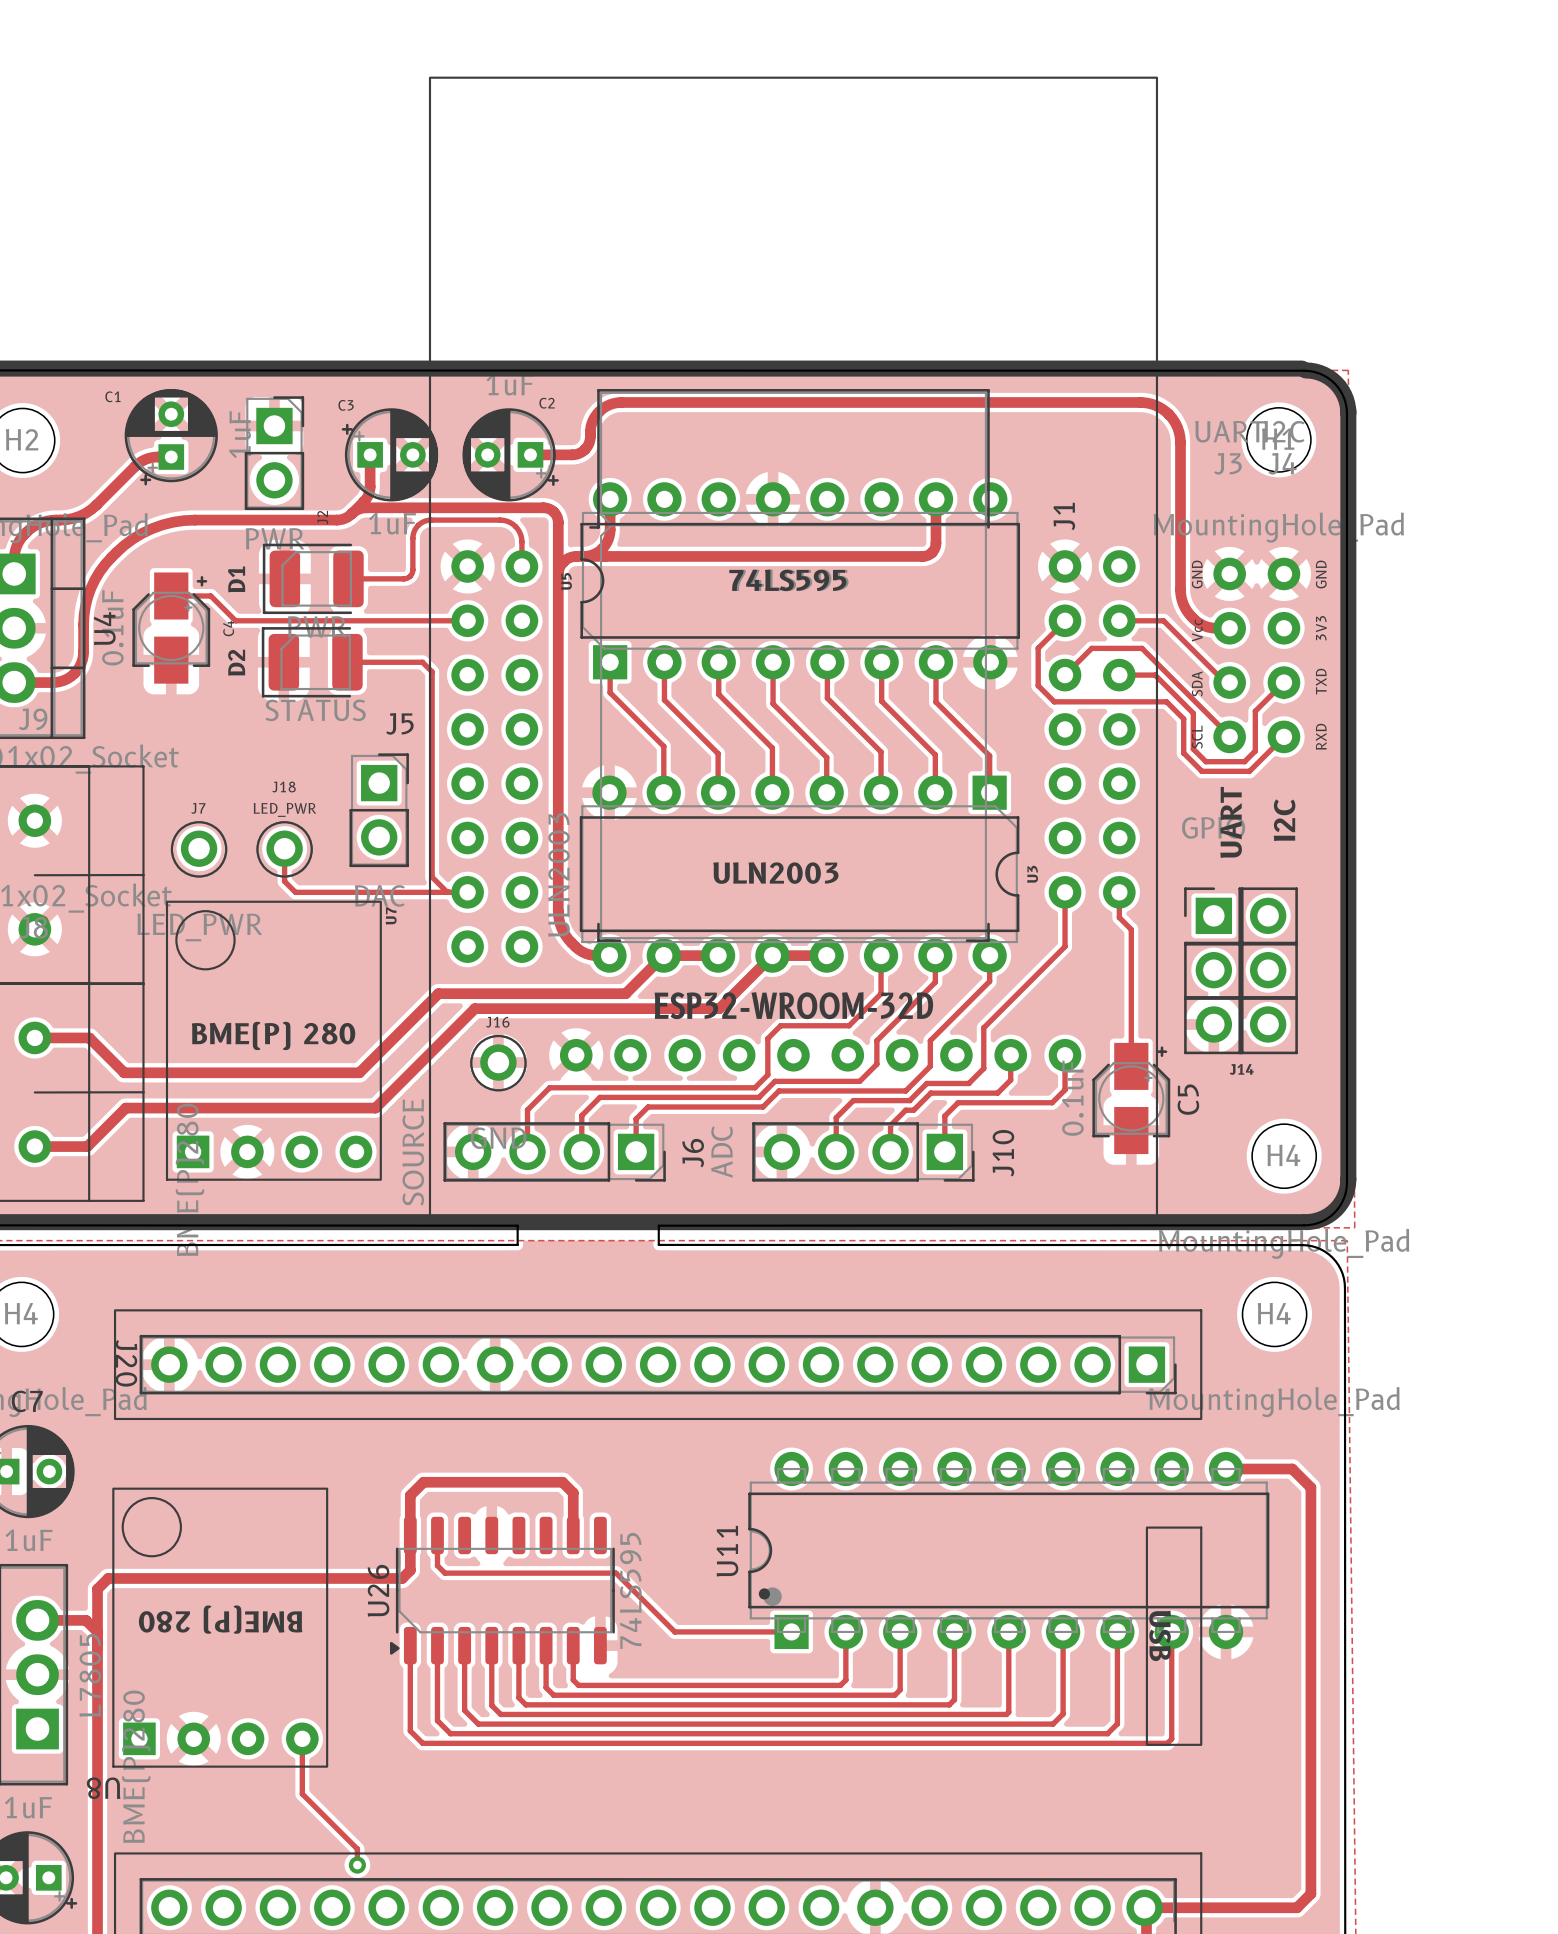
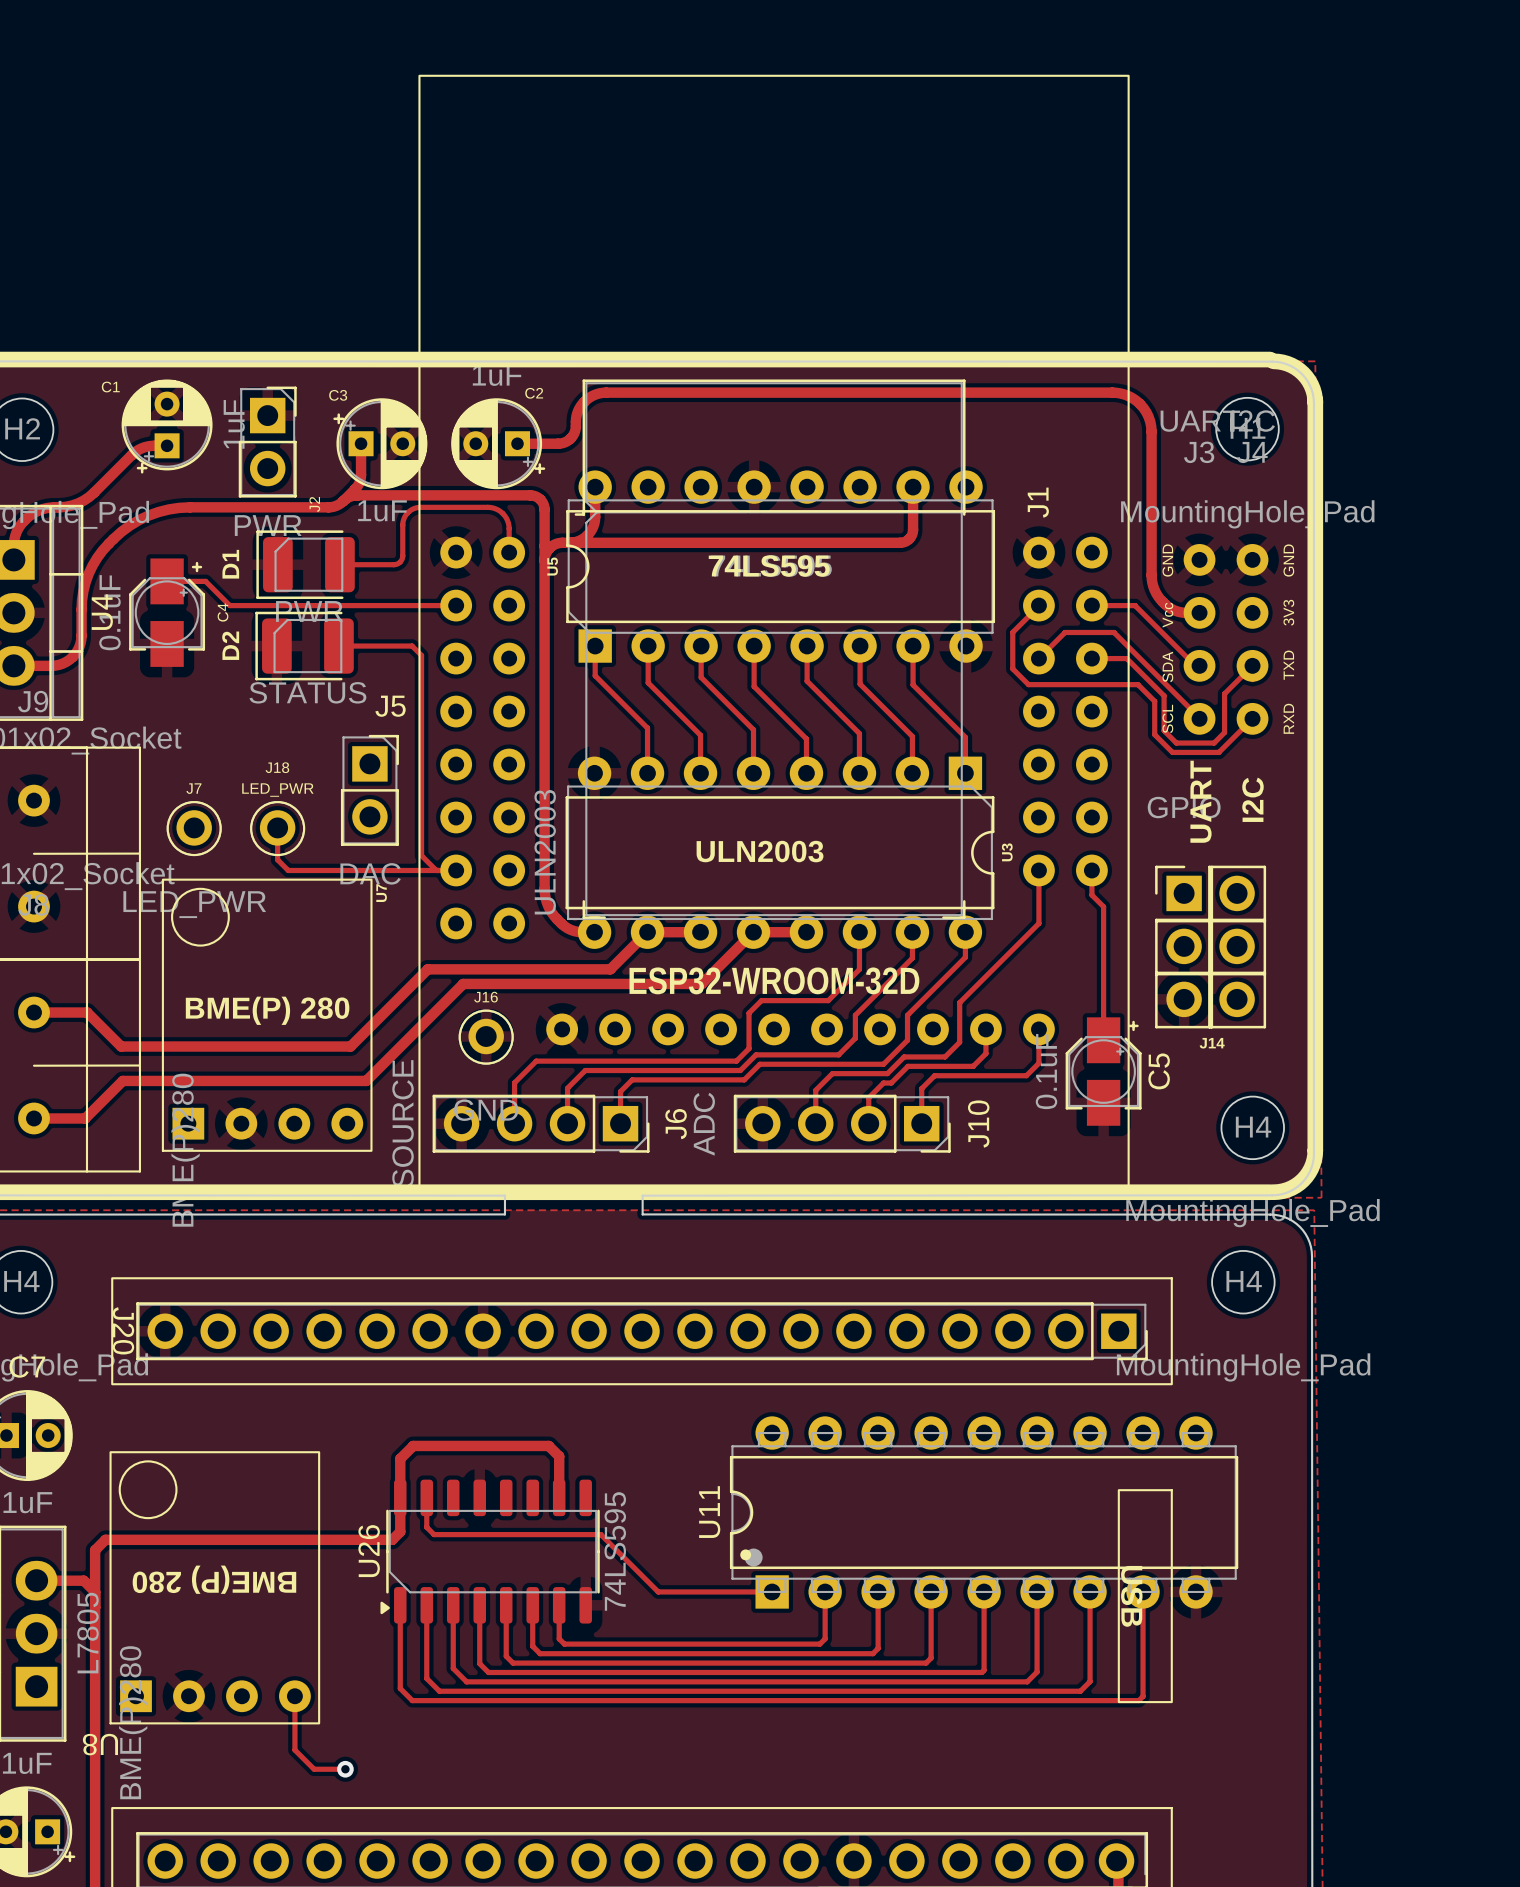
track: (1226, 1469) (1292, 1469) (1310, 1487) (1310, 1893) (1297, 1907) (1144, 1907) -> none
track: (322, 1813) (357, 1849) (357, 1865) -> (314, 1769) (345, 1769)
via position: (357, 1865) -> (345, 1769)

